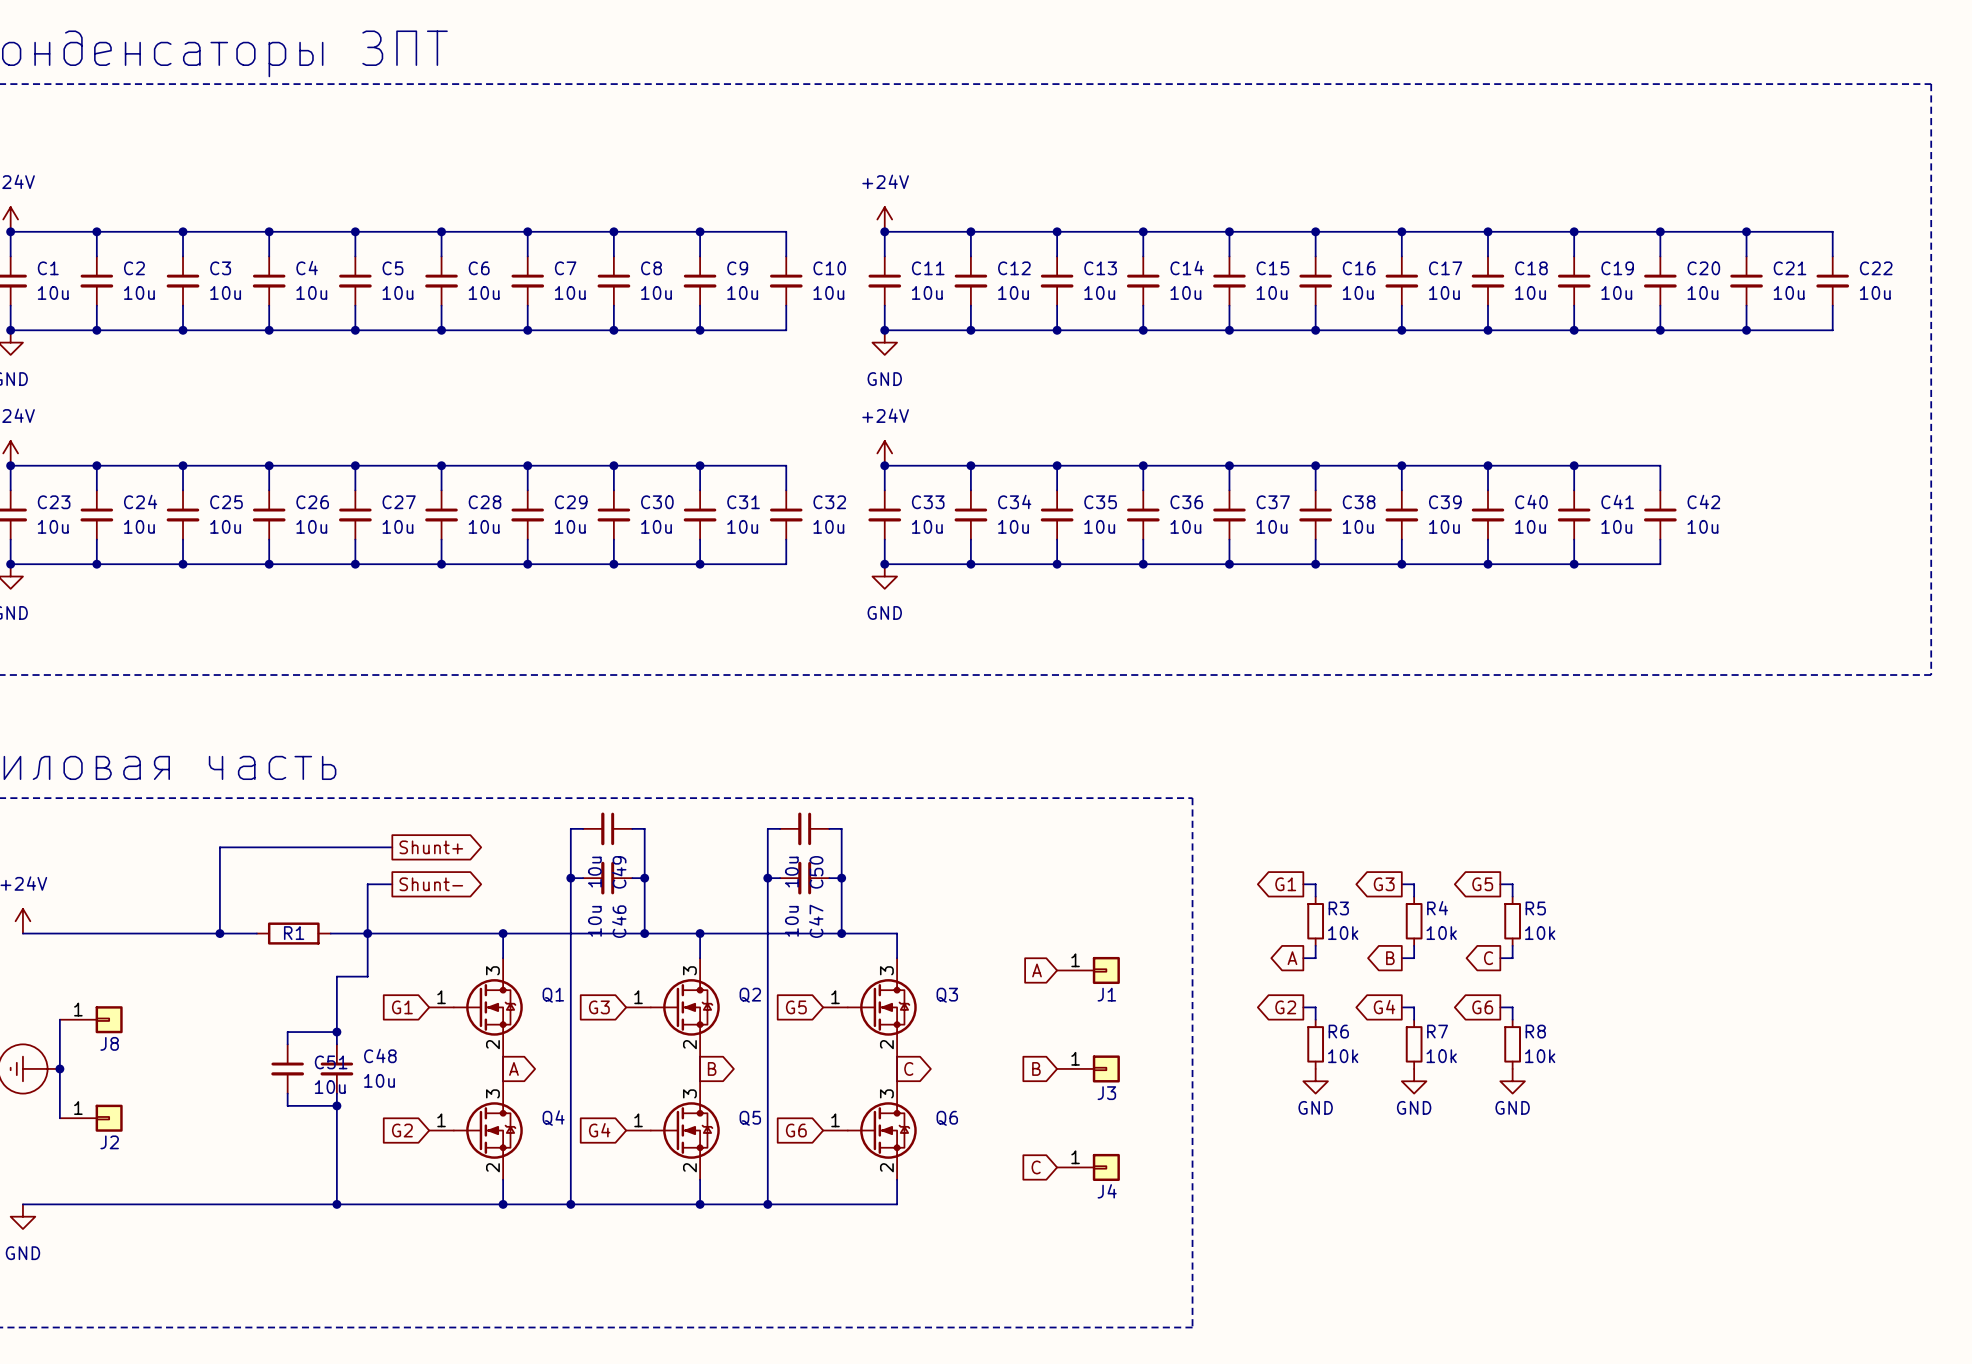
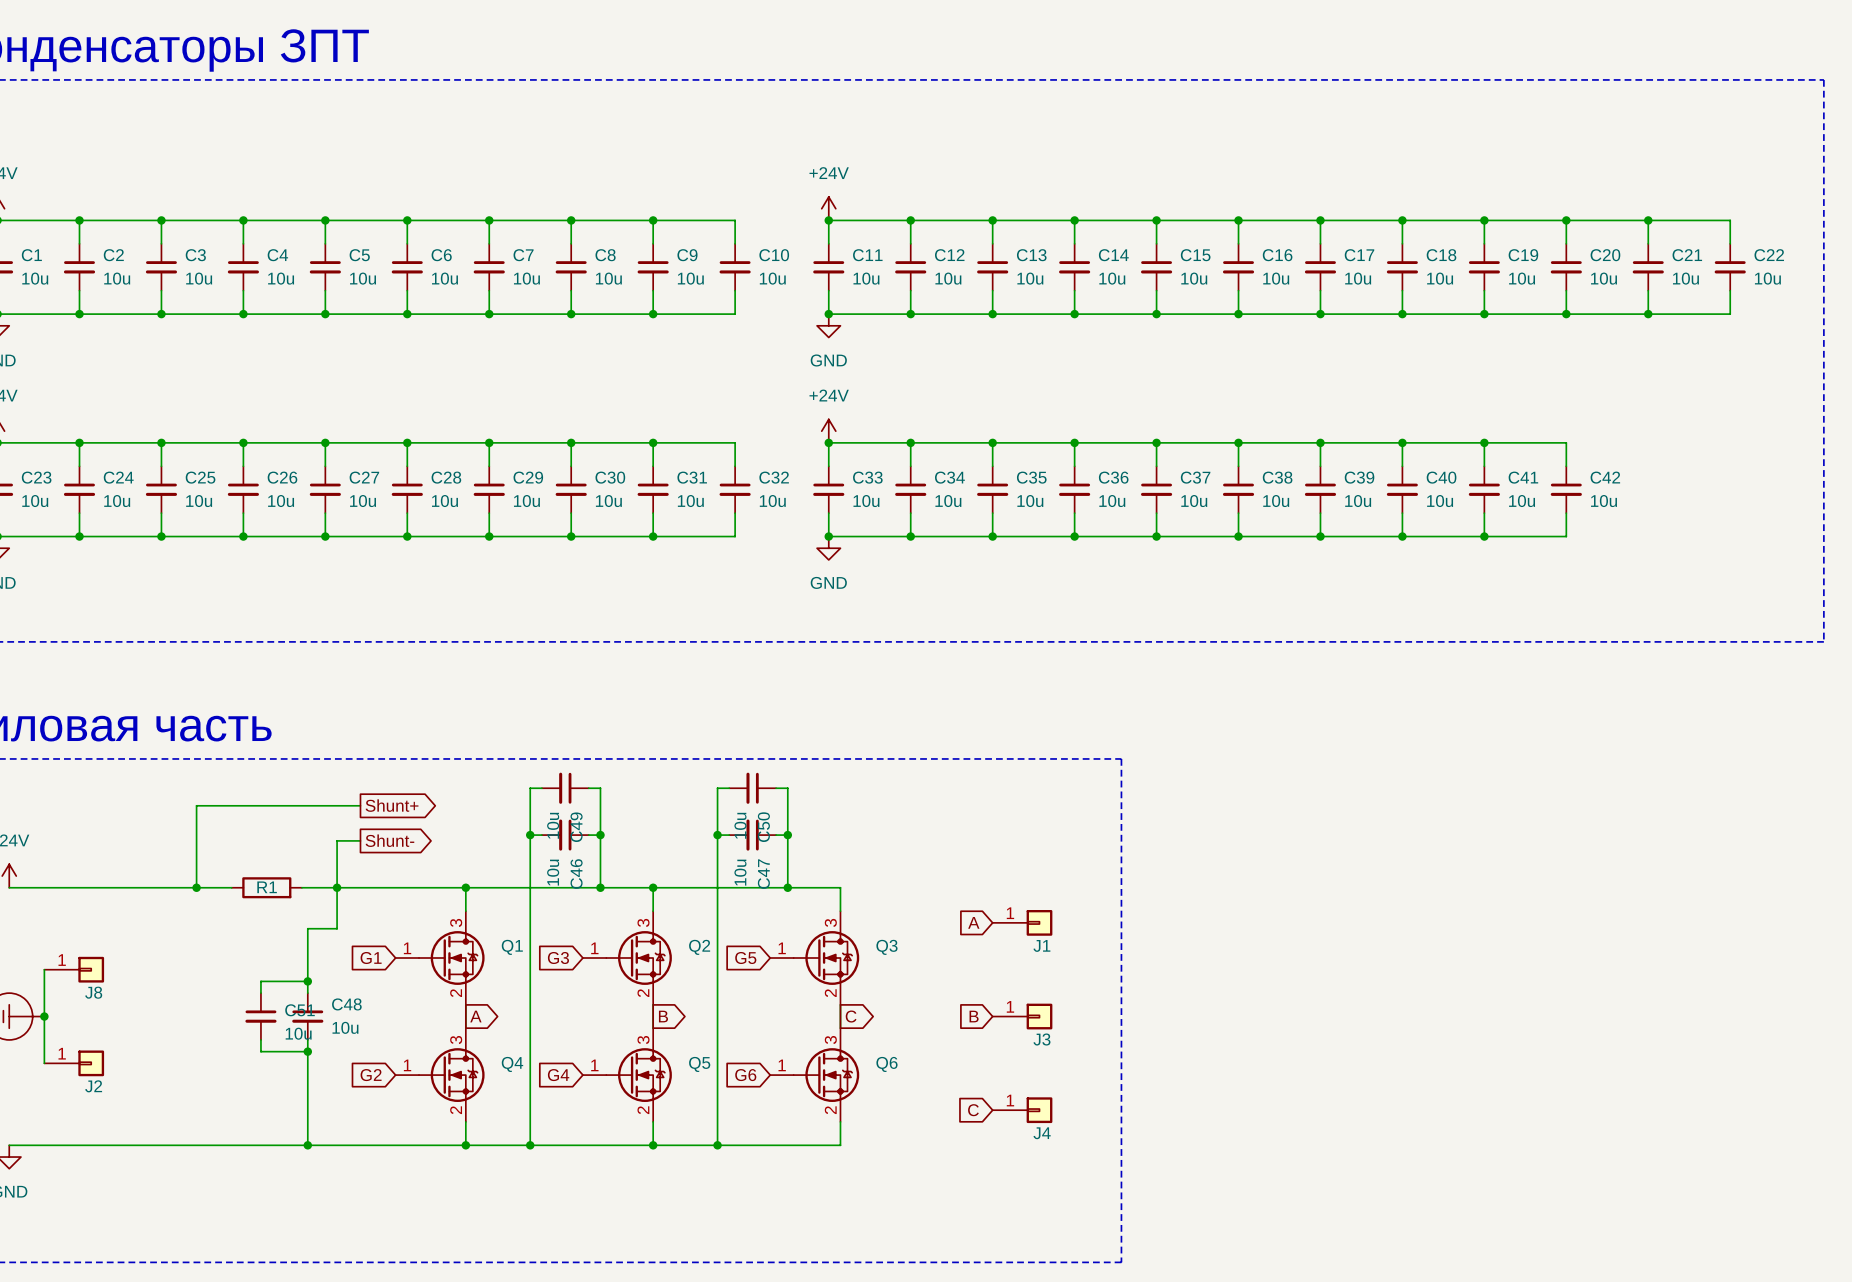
global label: G1 (1285, 884) -> none
wire: (1303, 884) (1315, 884) (1315, 896) -> none
global label: G3 (1384, 884) -> none
wire: (1401, 884) (1414, 884) (1414, 896) -> none
global label: G5 (1482, 884) -> none
wire: (1500, 884) (1512, 884) (1512, 896) -> none
R3: 10k (1315, 921) -> none
R4: 10k (1414, 921) -> none
R5: 10k (1512, 921) -> none
wire: (1315, 945) (1315, 958) (1303, 958) -> none
wire: (1414, 945) (1414, 958) (1401, 958) -> none
wire: (1512, 945) (1512, 958) (1500, 958) -> none
global label: A (1292, 958) -> none
global label: B (1390, 958) -> none
global label: C (1488, 958) -> none
global label: G2 (1285, 1007) -> none
wire: (1303, 1007) (1315, 1007) (1315, 1019) -> none
global label: G4 (1384, 1007) -> none
wire: (1401, 1007) (1414, 1007) (1414, 1019) -> none
global label: G6 (1482, 1007) -> none
wire: (1500, 1007) (1512, 1007) (1512, 1019) -> none
R6: 10k (1315, 1044) -> none
R7: 10k (1414, 1044) -> none
R8: 10k (1512, 1044) -> none
power symbol: GND (1315, 1081) -> none
power symbol: GND (1414, 1081) -> none
power symbol: GND (1512, 1081) -> none

